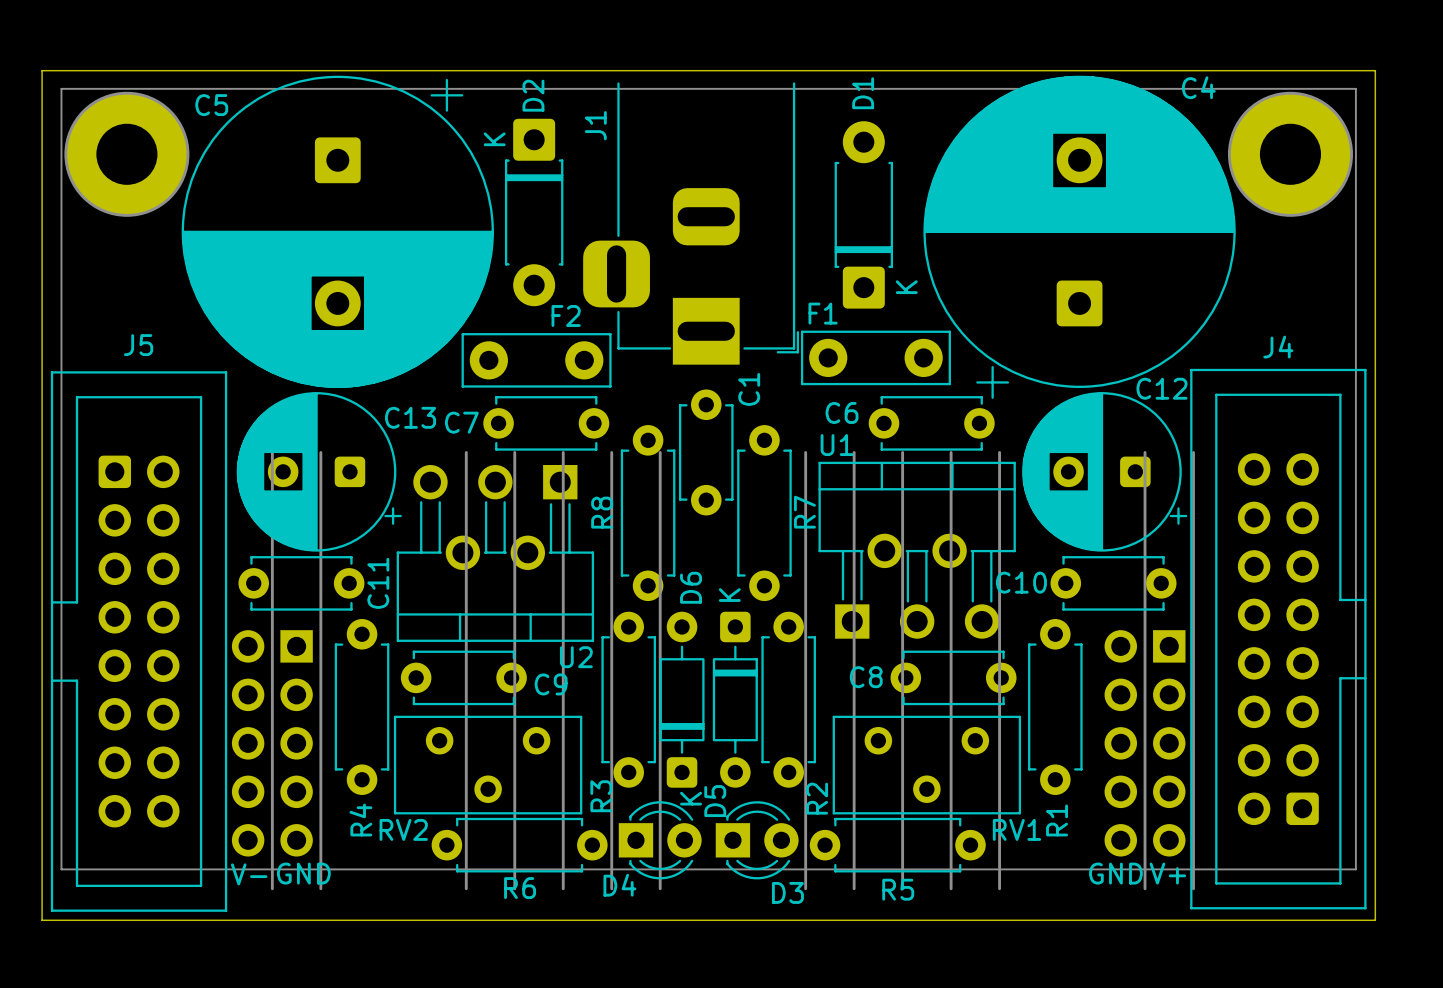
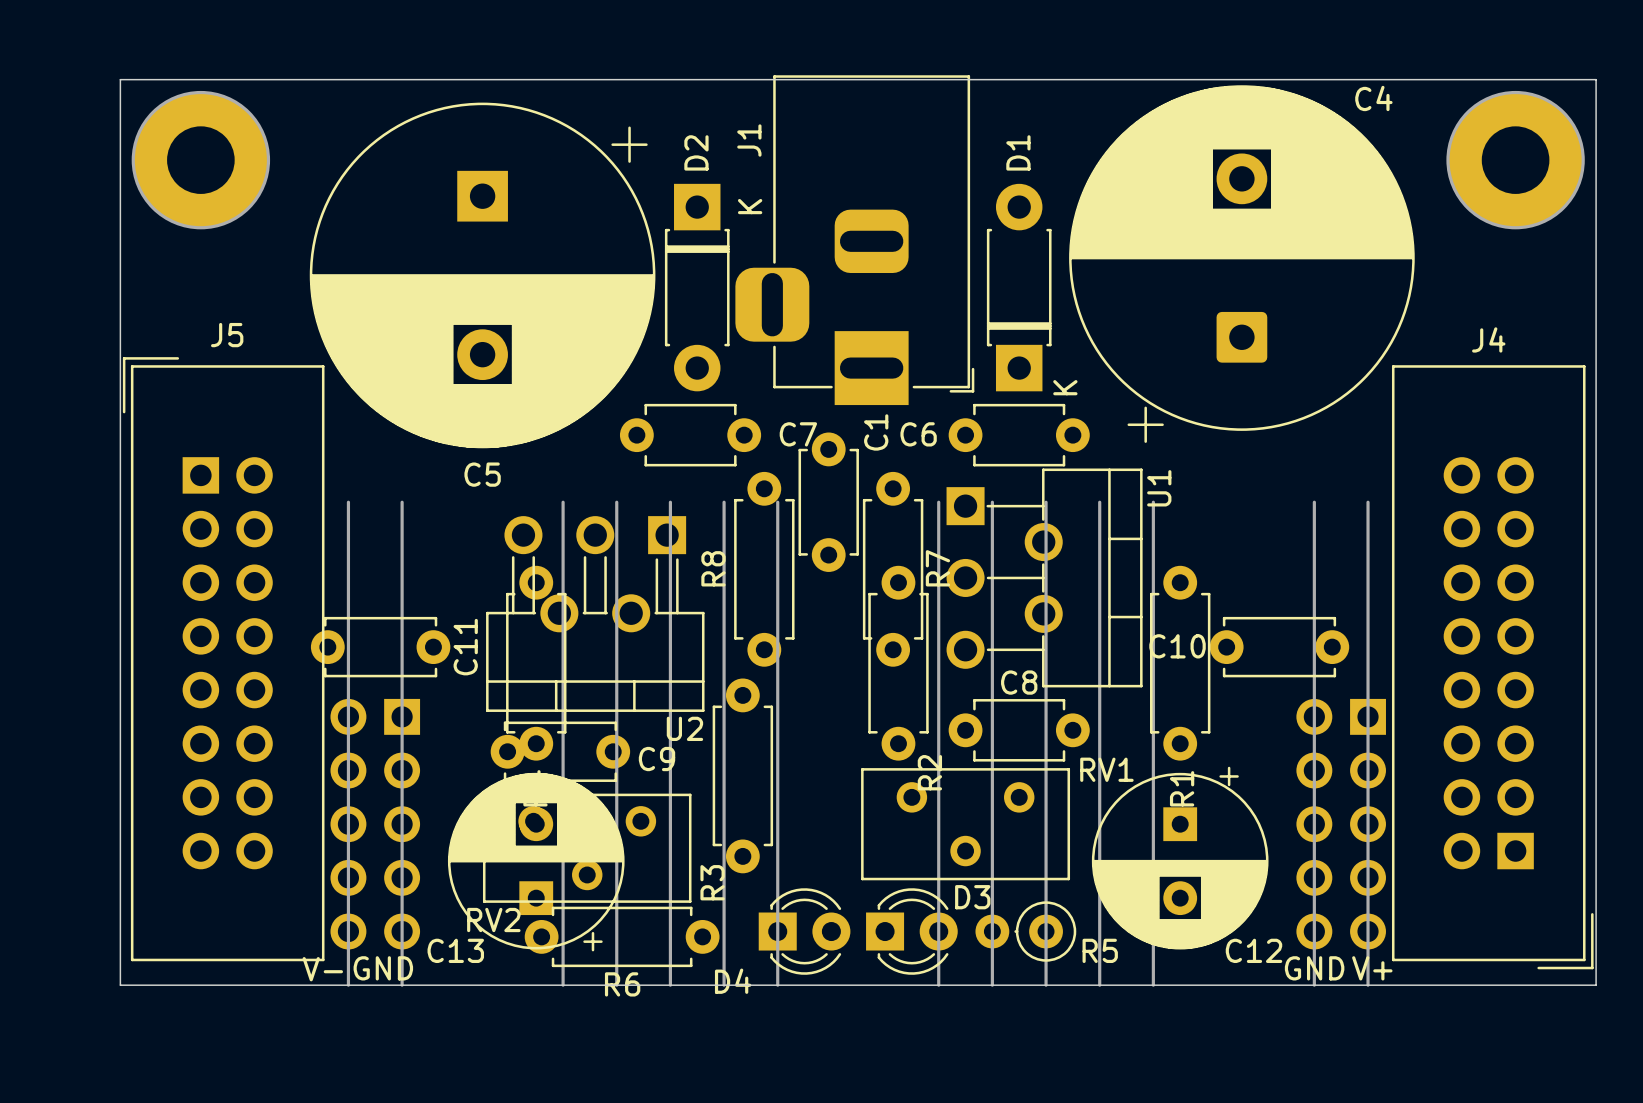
board edge: (66, 70) (42, 70) (42, 920) (1375, 920) (1375, 70) -> (120, 79) (120, 985) (1596, 985) (1596, 79) (1569, 79)
C5 footprint: [181, 75, 494, 389] -> [309, 102, 656, 449]
J1 footprint: [583, 82, 800, 365] -> [735, 75, 975, 406]
line: (61, 88) (1355, 88) (1355, 869) (61, 869) (61, 88) -> none
C5 name position: C5 (211, 105) -> C5 (482, 474)
D2 footprint: [504, 118, 564, 307] -> [664, 183, 730, 392]
D1 footprint: [834, 121, 894, 309] -> [986, 183, 1052, 392]
part position: (126, 154) -> (200, 160)
part position: (1290, 154) -> (1515, 160)
F1: (875, 357) -> none
F2: (536, 360) -> none
J4 footprint: [1190, 368, 1367, 910] -> [1391, 365, 1594, 970]
J5 footprint: [50, 371, 228, 912] -> [122, 357, 325, 962]
C12 name position: C12 (1161, 388) -> C12 (1253, 950)
C13 footprint: [236, 392, 402, 552] -> [447, 772, 625, 952]
C12 footprint: [1022, 392, 1188, 552] -> [1091, 766, 1269, 950]
C7 footprint: [483, 396, 610, 451] -> [619, 403, 762, 467]
C6 footprint: [868, 396, 995, 451] -> [948, 403, 1090, 467]
C13 name position: C13 (410, 417) -> C13 (455, 950)
C7 name position: C7 (461, 422) -> C7 (798, 434)
U1 name position: U1 (837, 445) -> U1 (1159, 488)
U1 footprint: [818, 461, 1016, 639] -> [946, 468, 1143, 688]
C8 footprint: [890, 650, 1017, 706] -> [948, 699, 1090, 762]
C8 name position: C8 (866, 677) -> C8 (1019, 682)
D6: (682, 699) -> none
D5: (735, 699) -> none
R2 position: (788, 699) -> (898, 663)
R4 position: (362, 706) -> (536, 663)
R1 position: (1055, 706) -> (1180, 663)
RV1 footprint: [832, 715, 1022, 815] -> [861, 768, 1071, 881]
part position: (272, 743) -> (375, 824)
part position: (1145, 743) -> (1341, 824)
R5 footprint: [809, 817, 986, 873] -> [975, 901, 1077, 962]
RV1 name position: RV1 (1017, 829) -> RV1 (1106, 769)
D4 position: (660, 840) -> (804, 931)
D3 position: (757, 840) -> (911, 931)
text position: GND (1115, 873) -> GND (1314, 968)
text position: V+ (1167, 873) -> V+ (1372, 968)
R5 name position: R5 (898, 889) -> R5 (1100, 950)
D3 name position: D3 (787, 892) -> D3 (972, 897)

